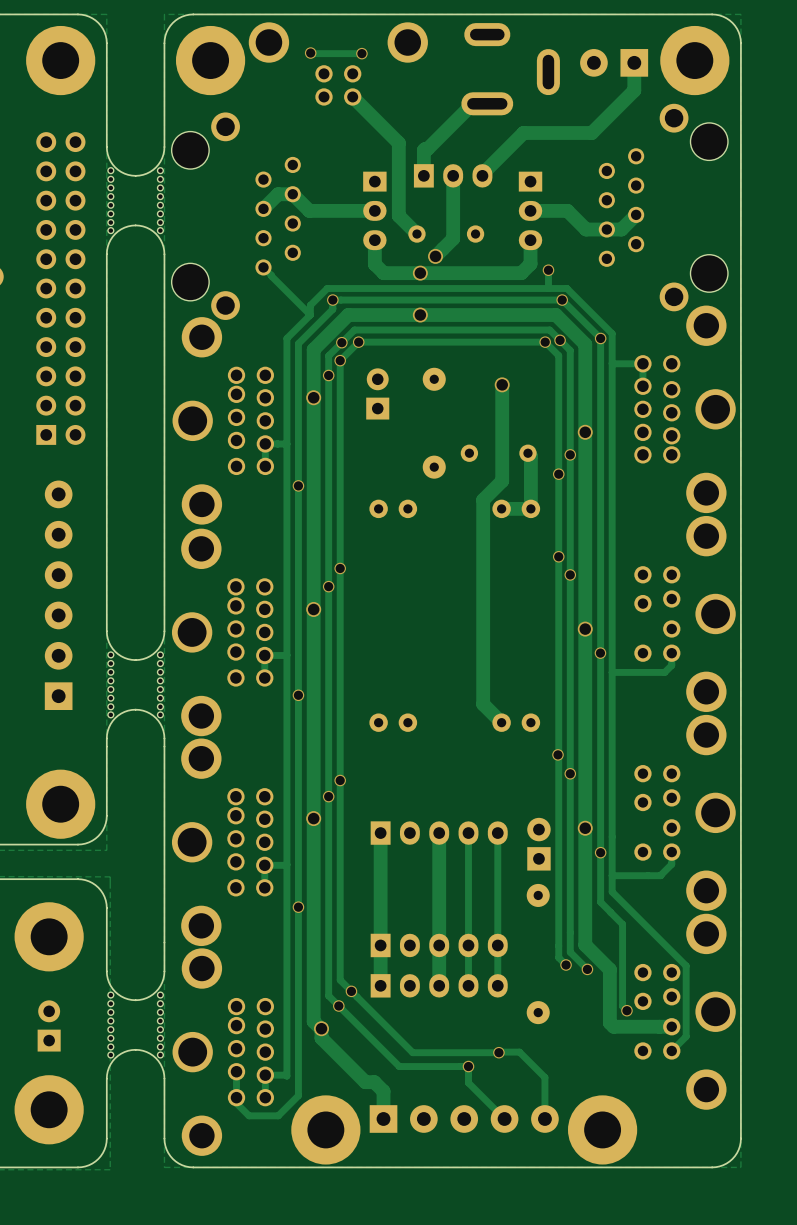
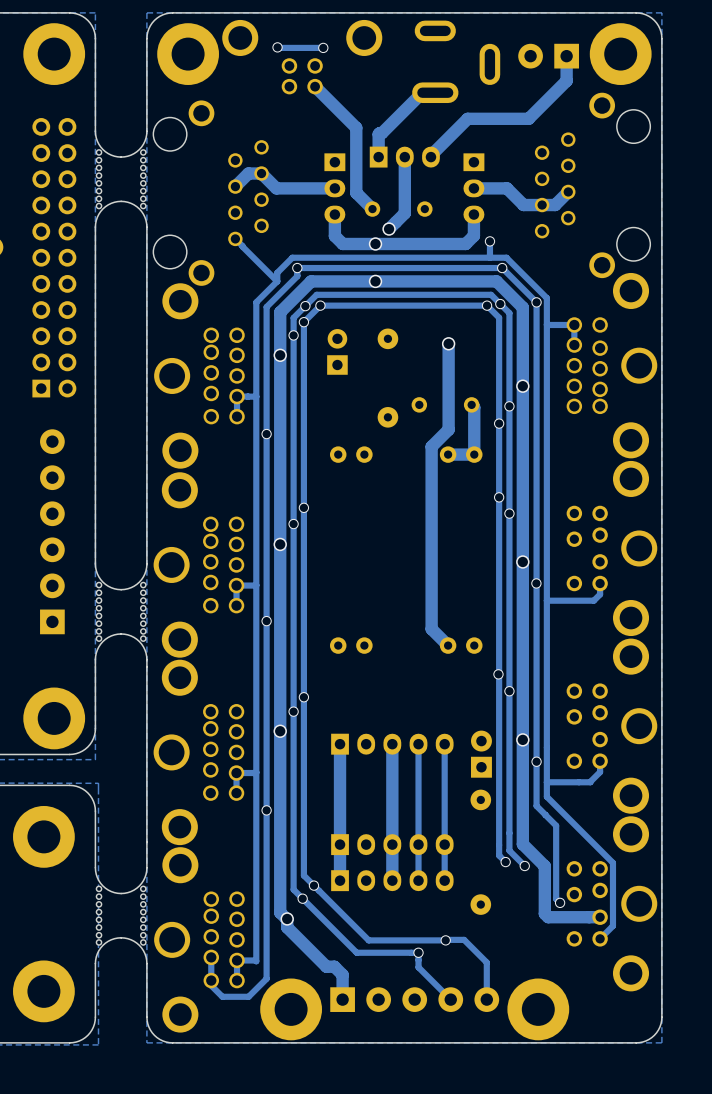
part: (49, 1025) -> none

